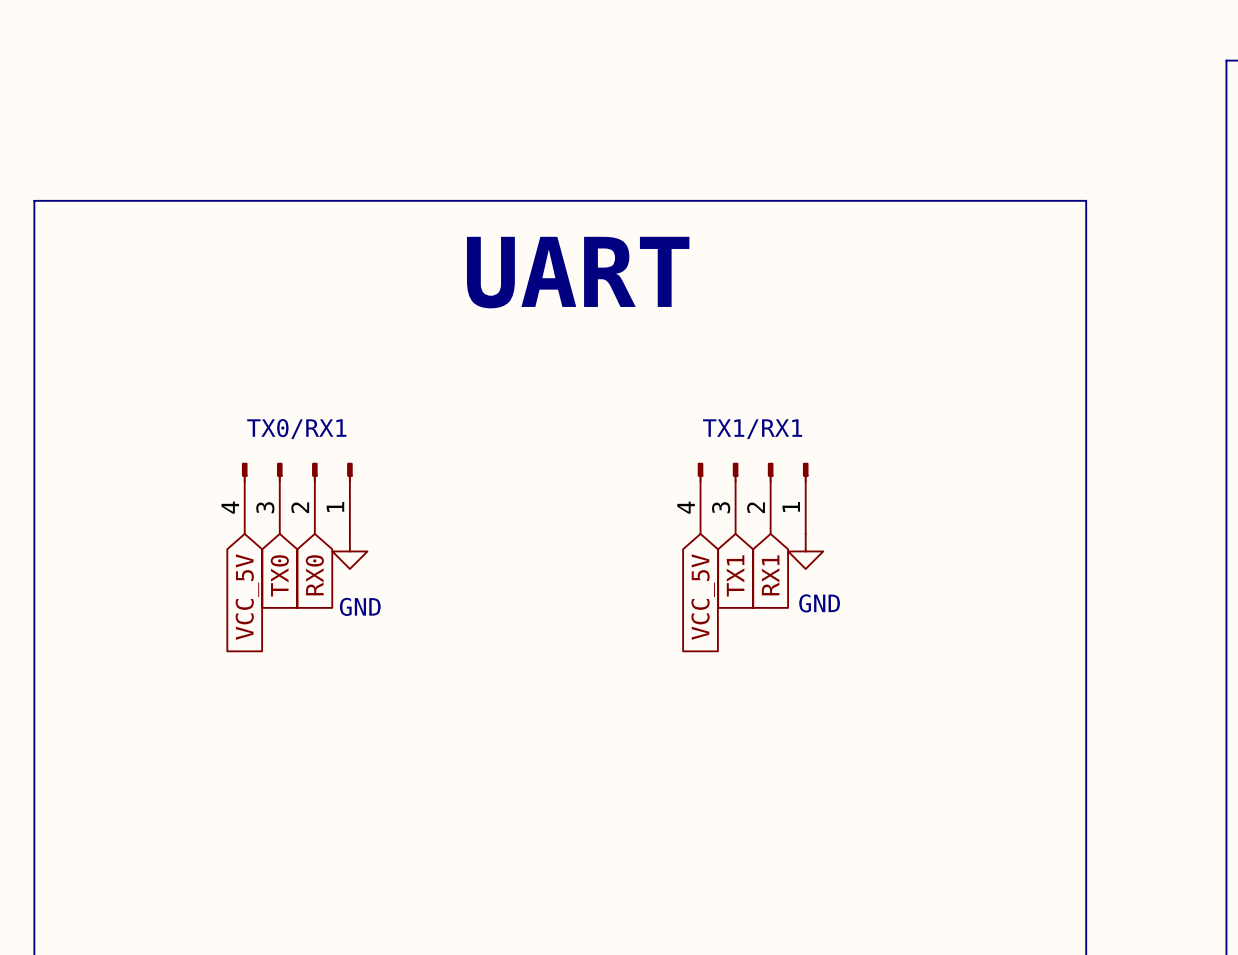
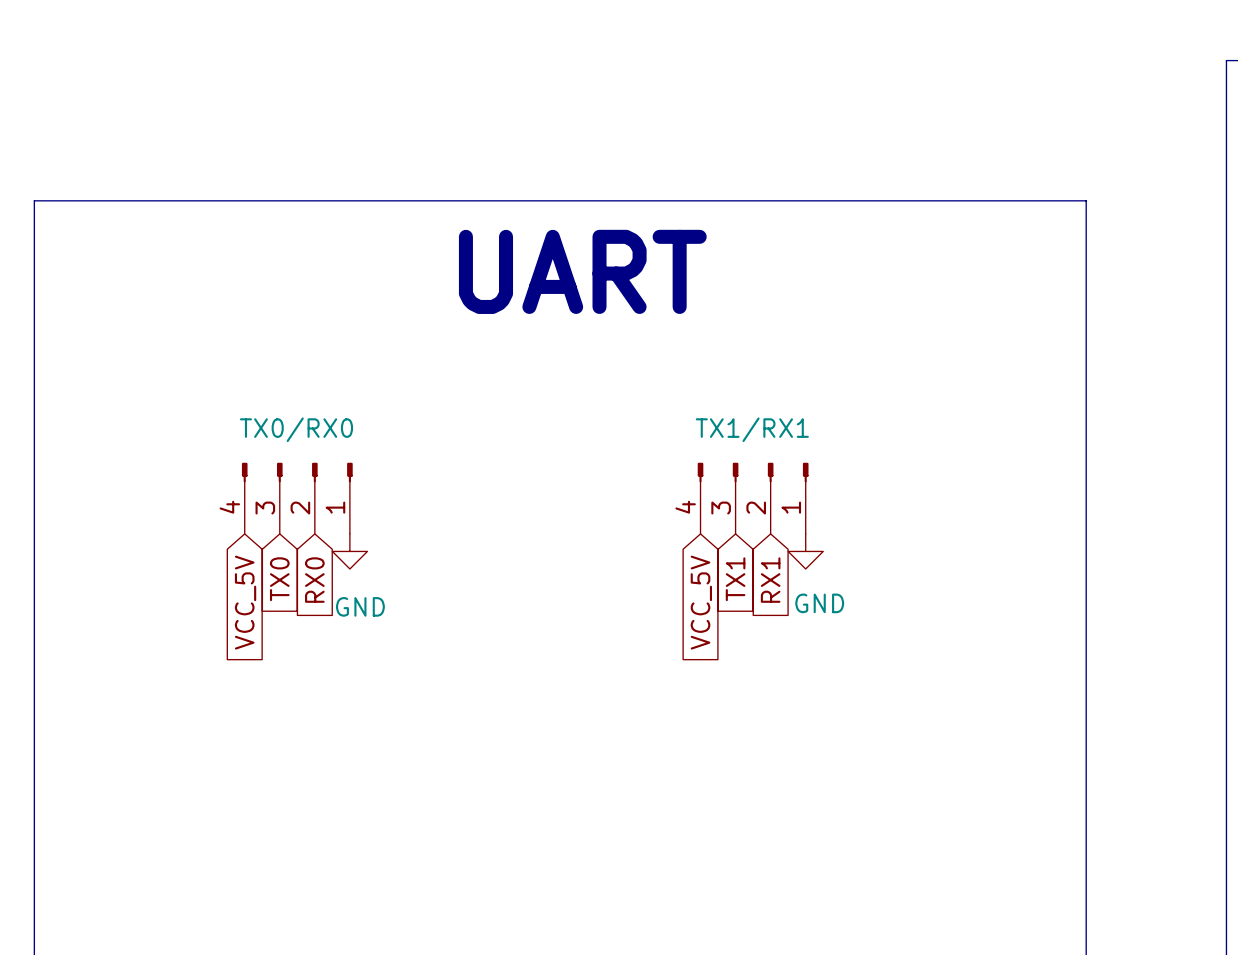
TX0/RX1 name: TX0/RX1 (296, 429) -> TX0/RX0 (296, 429)

